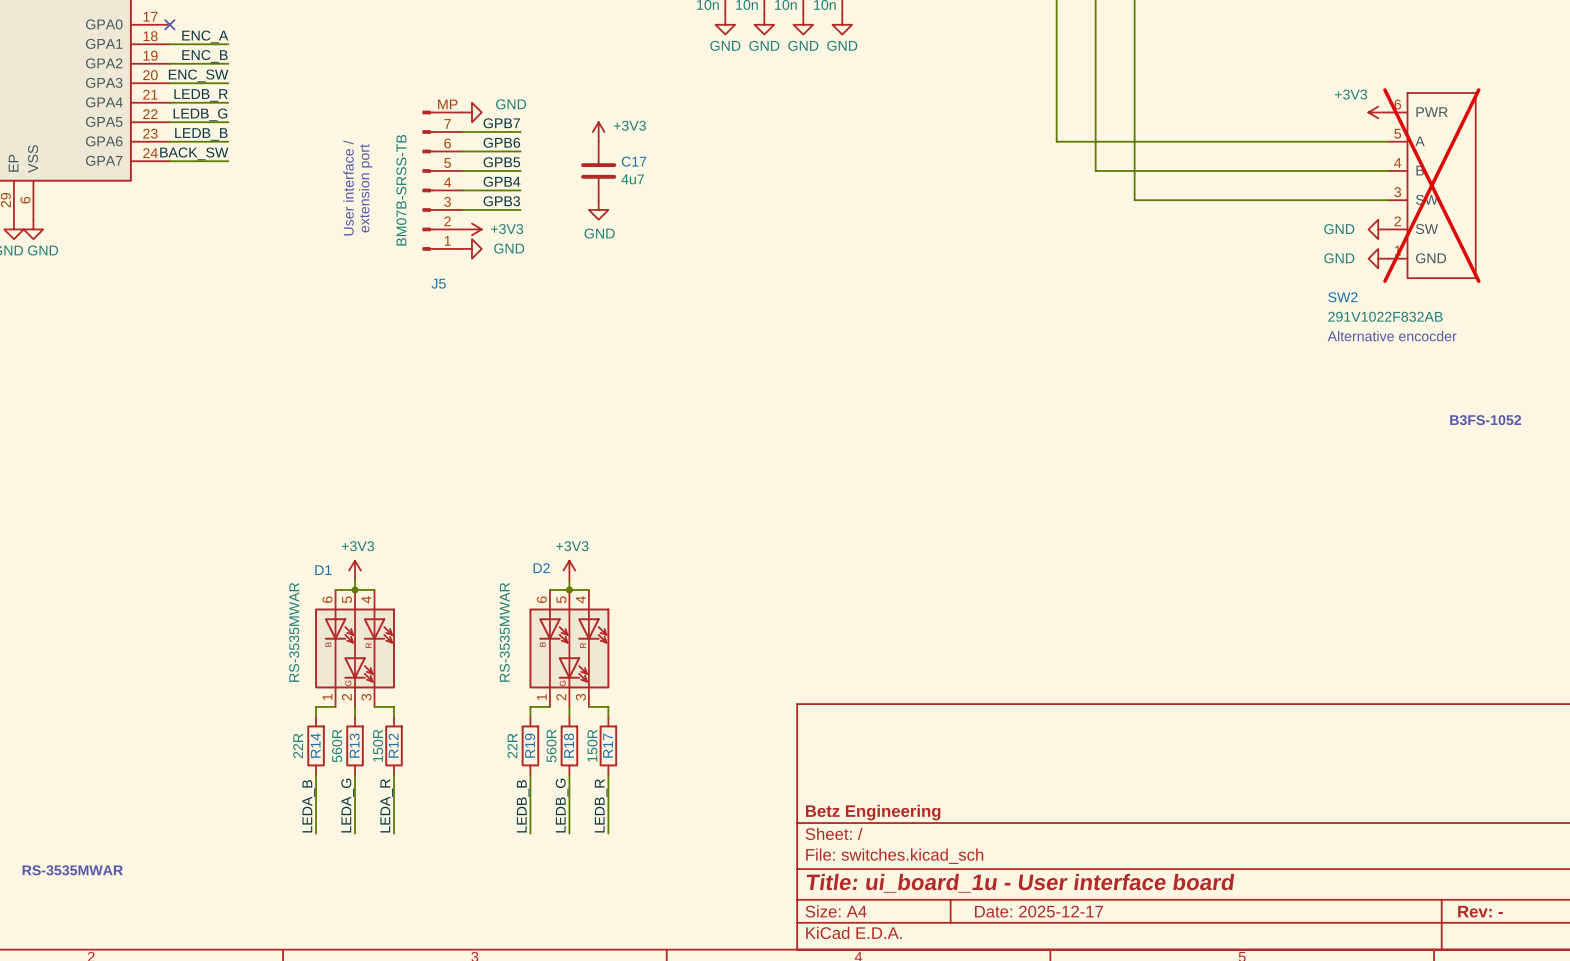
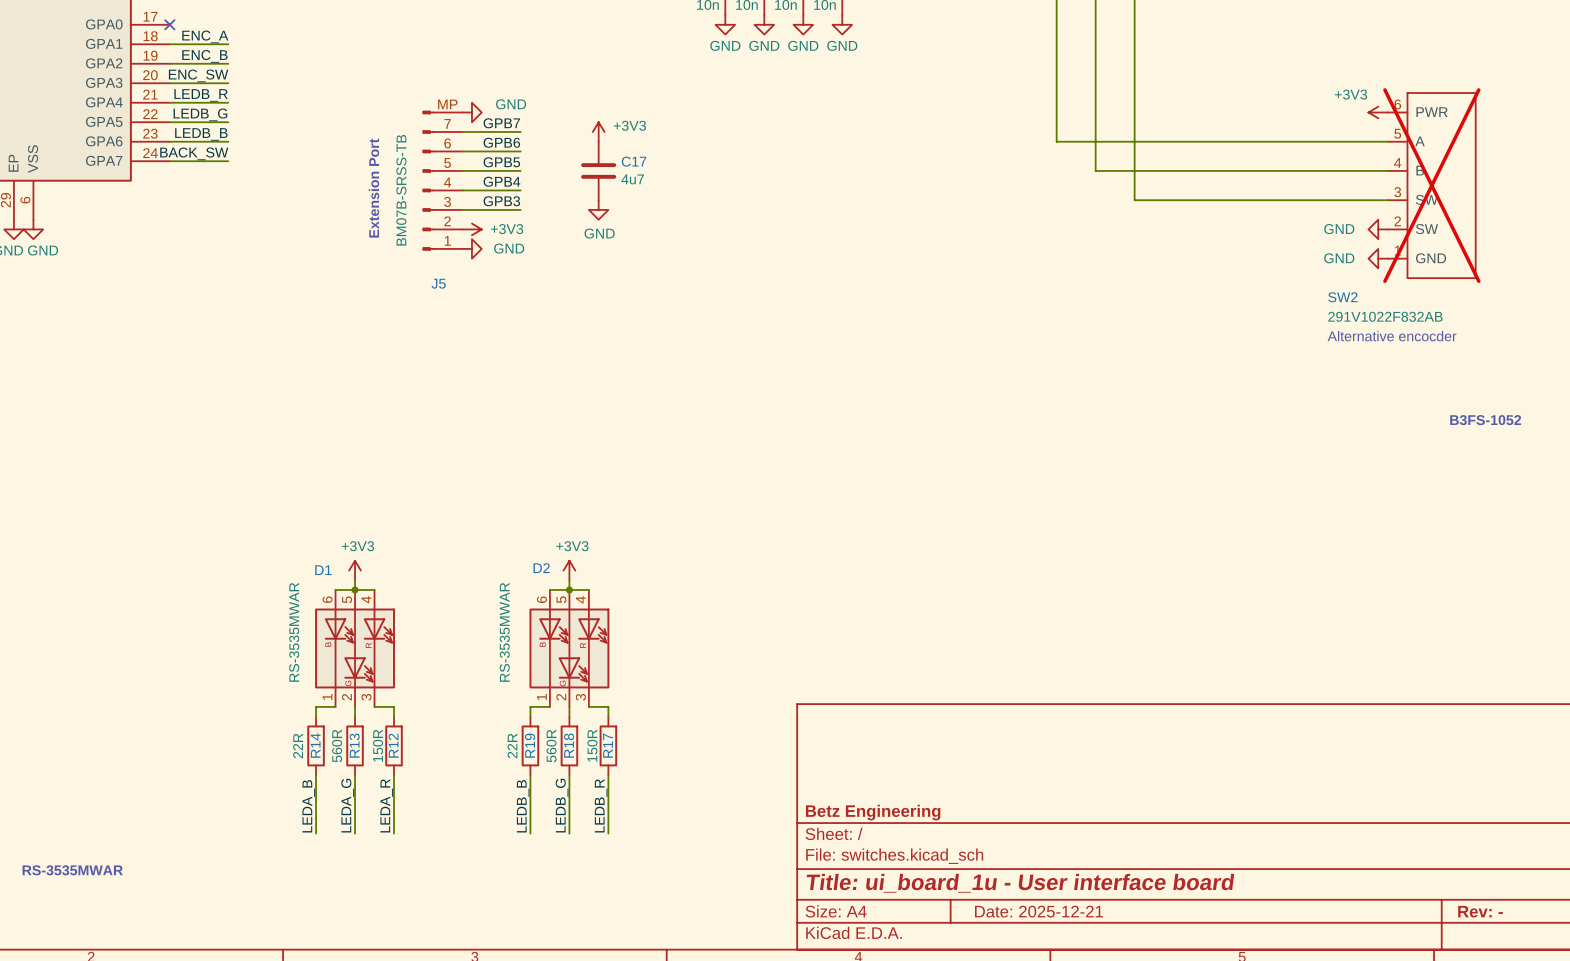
text: User interface / (348, 187) -> none
text: extension port (365, 188) -> Extension Port (373, 188)
title block: Date: 2025-12-17 (1039, 911) -> Date: 2025-12-21 (1039, 911)

